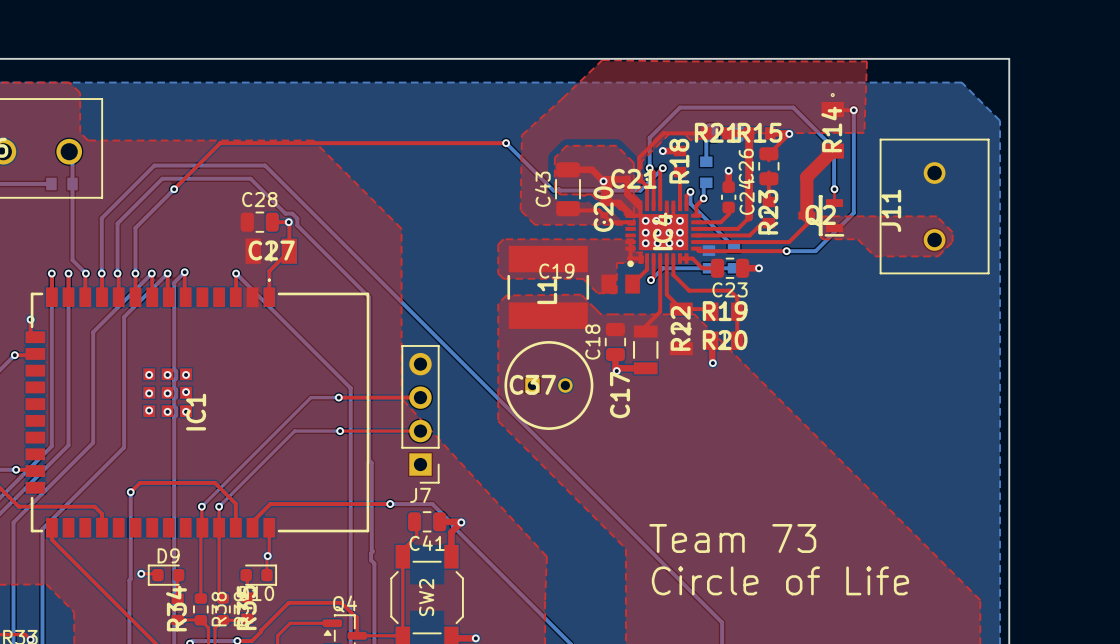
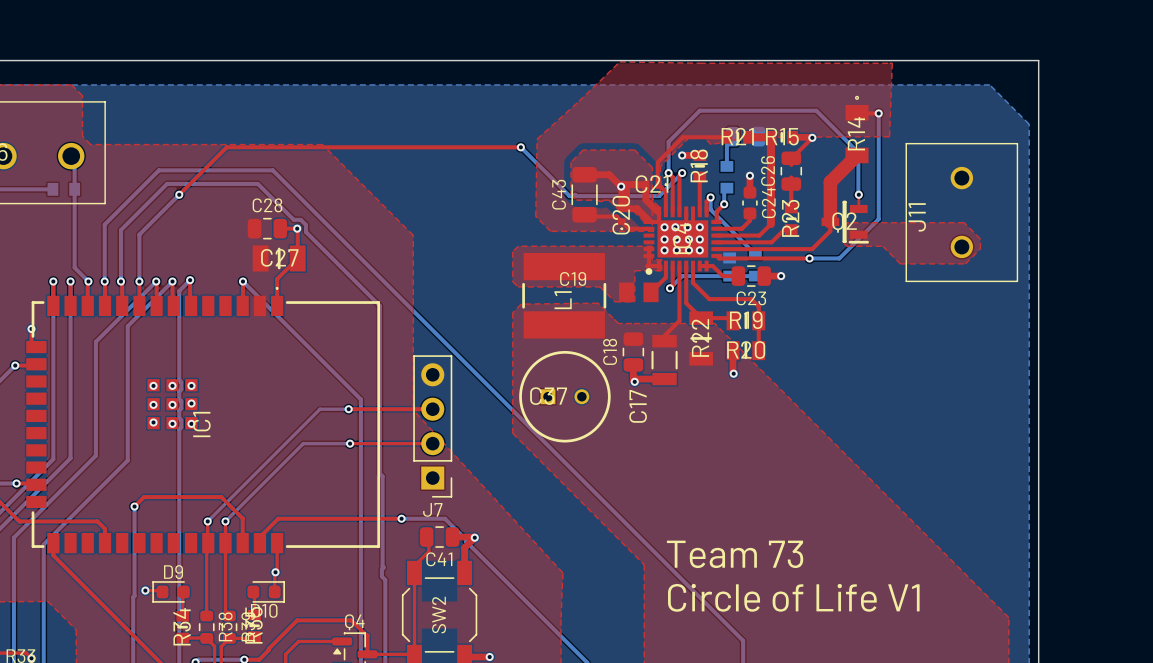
text: Circle of Life (780, 580) -> Circle of Life V1 (793, 597)

